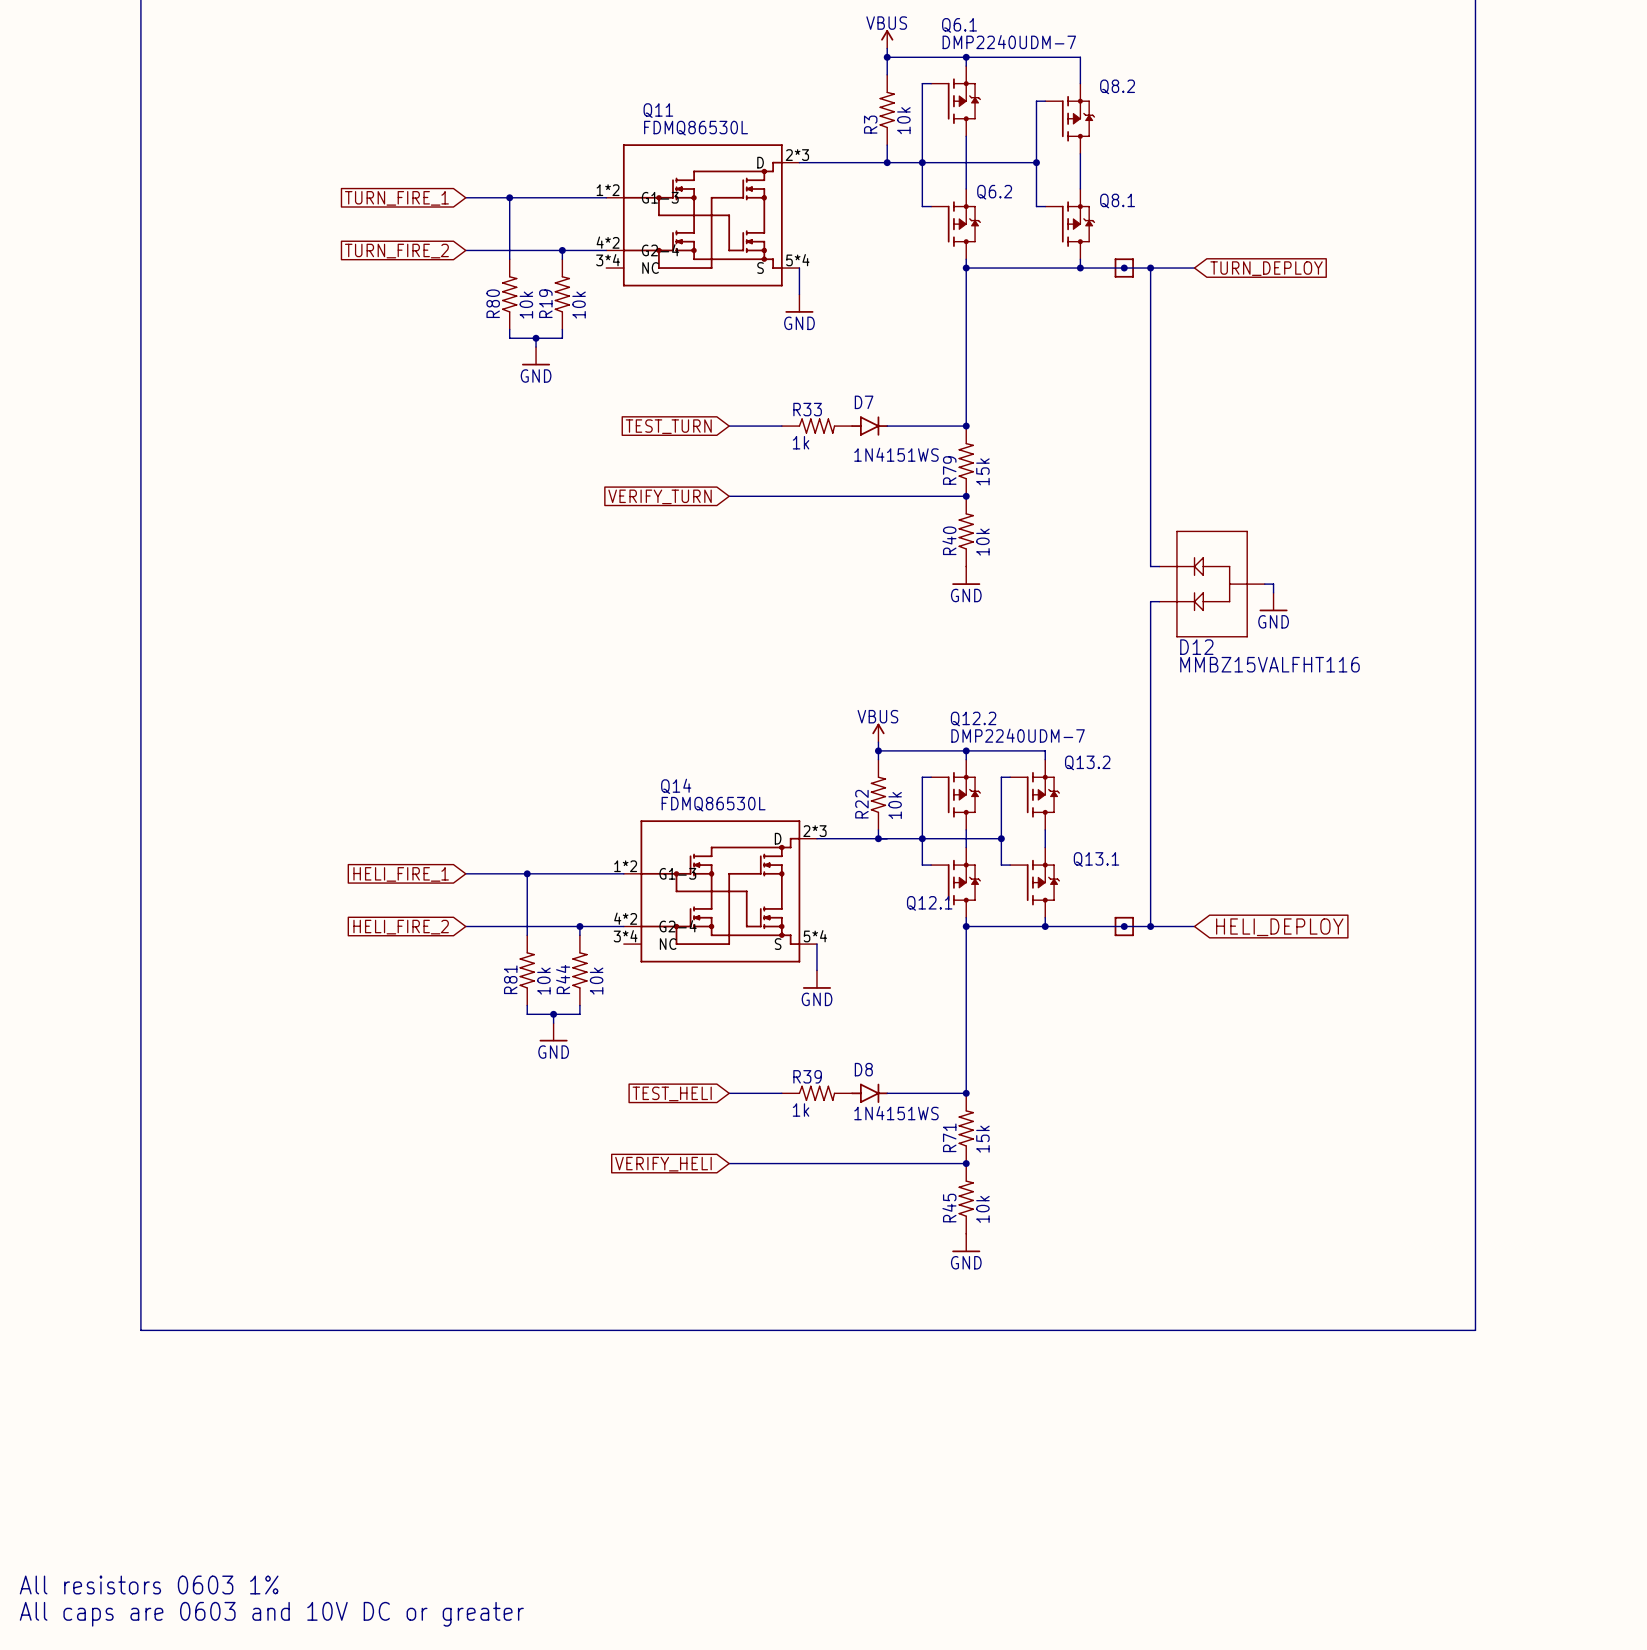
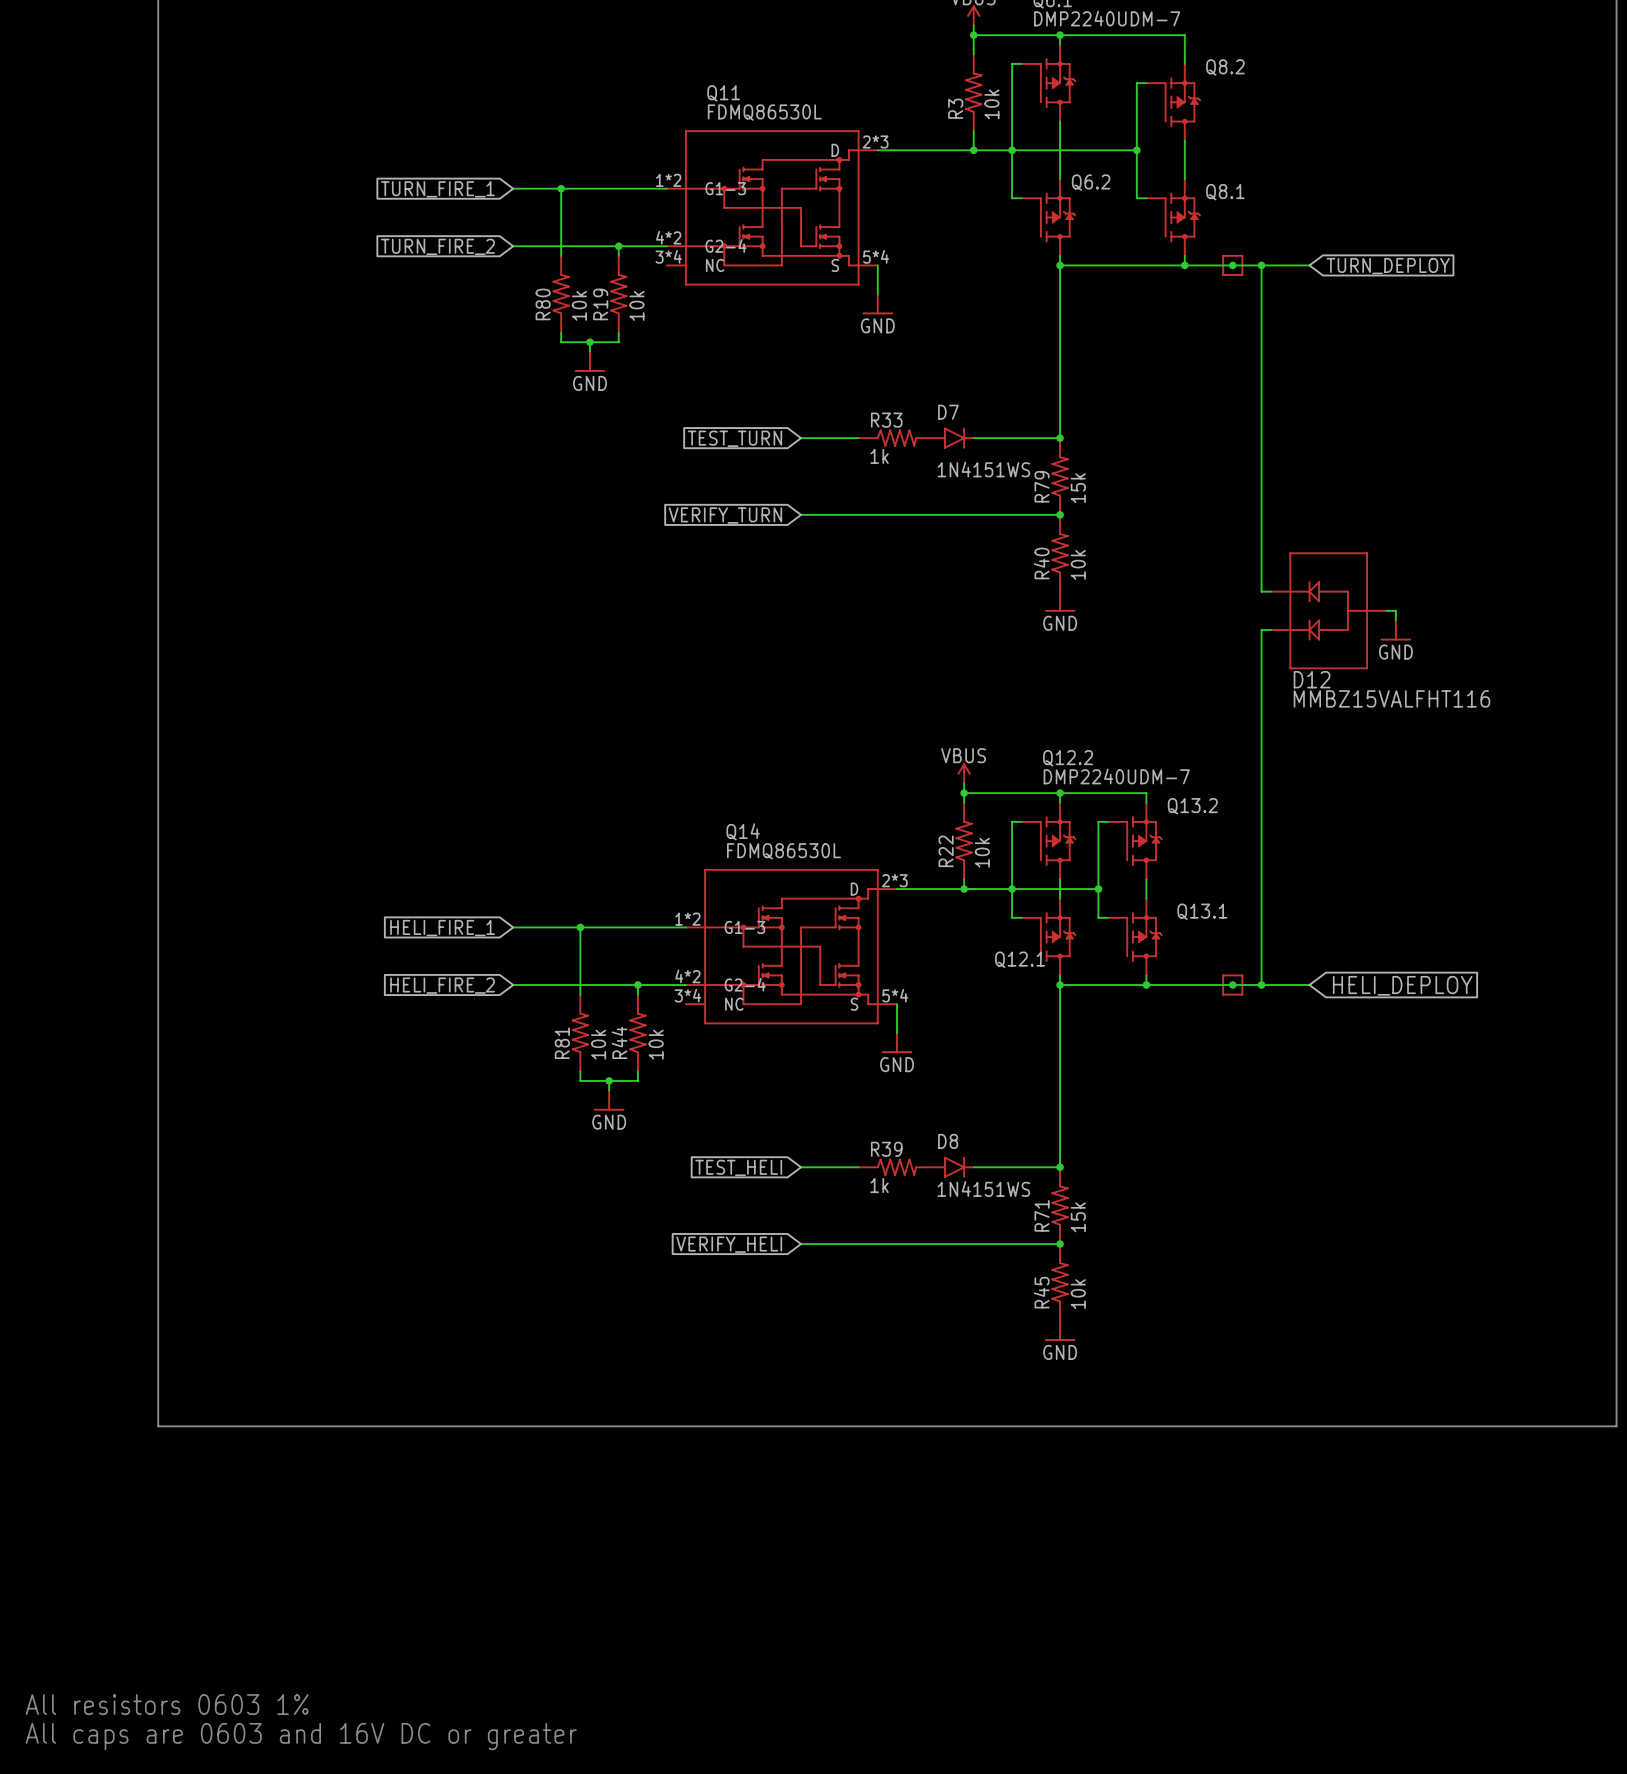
text: All caps are 0603 and 10V DC or greater (271, 1614) -> All caps are 0603 and 16V DC or greater (301, 1736)

